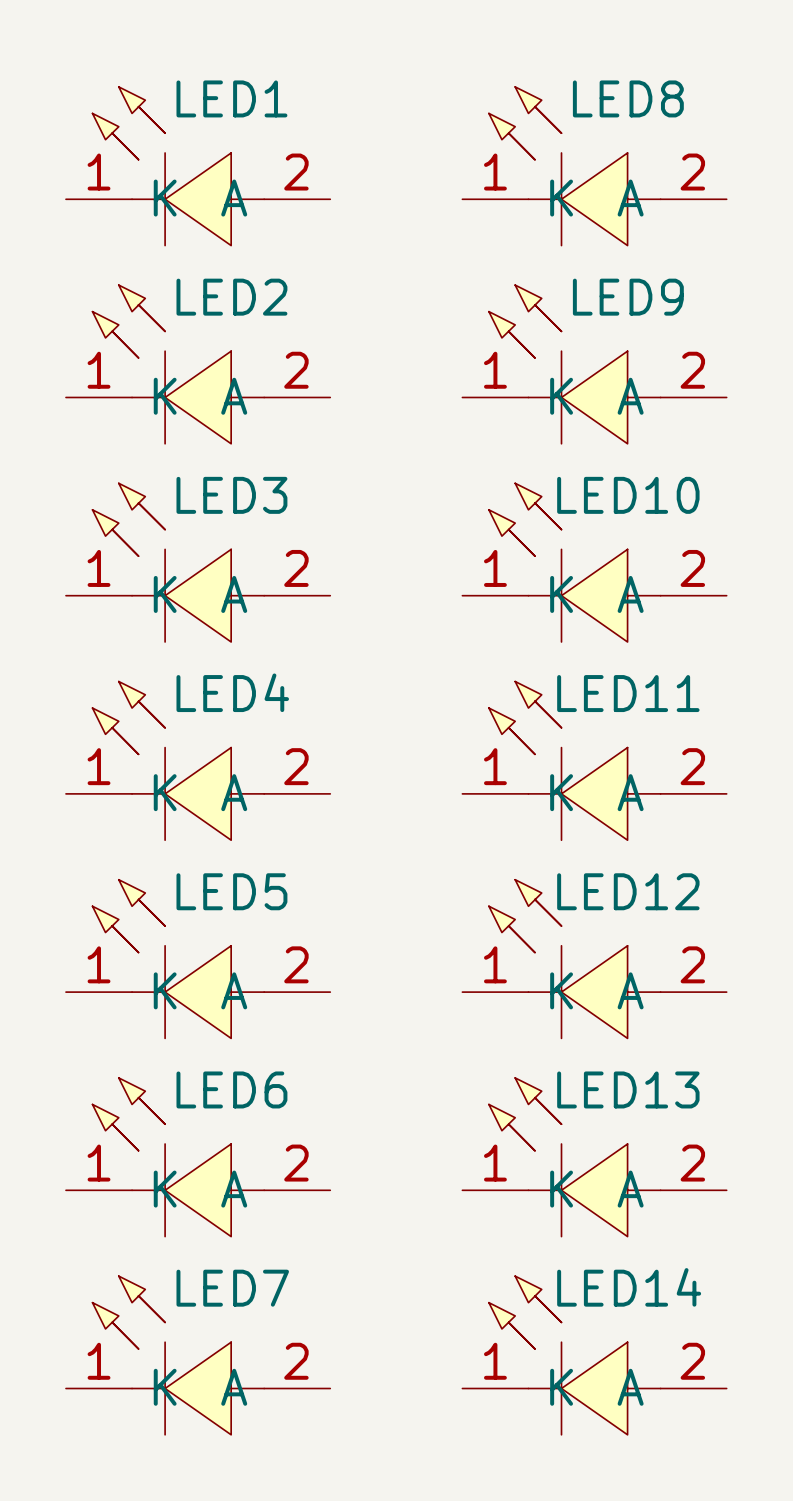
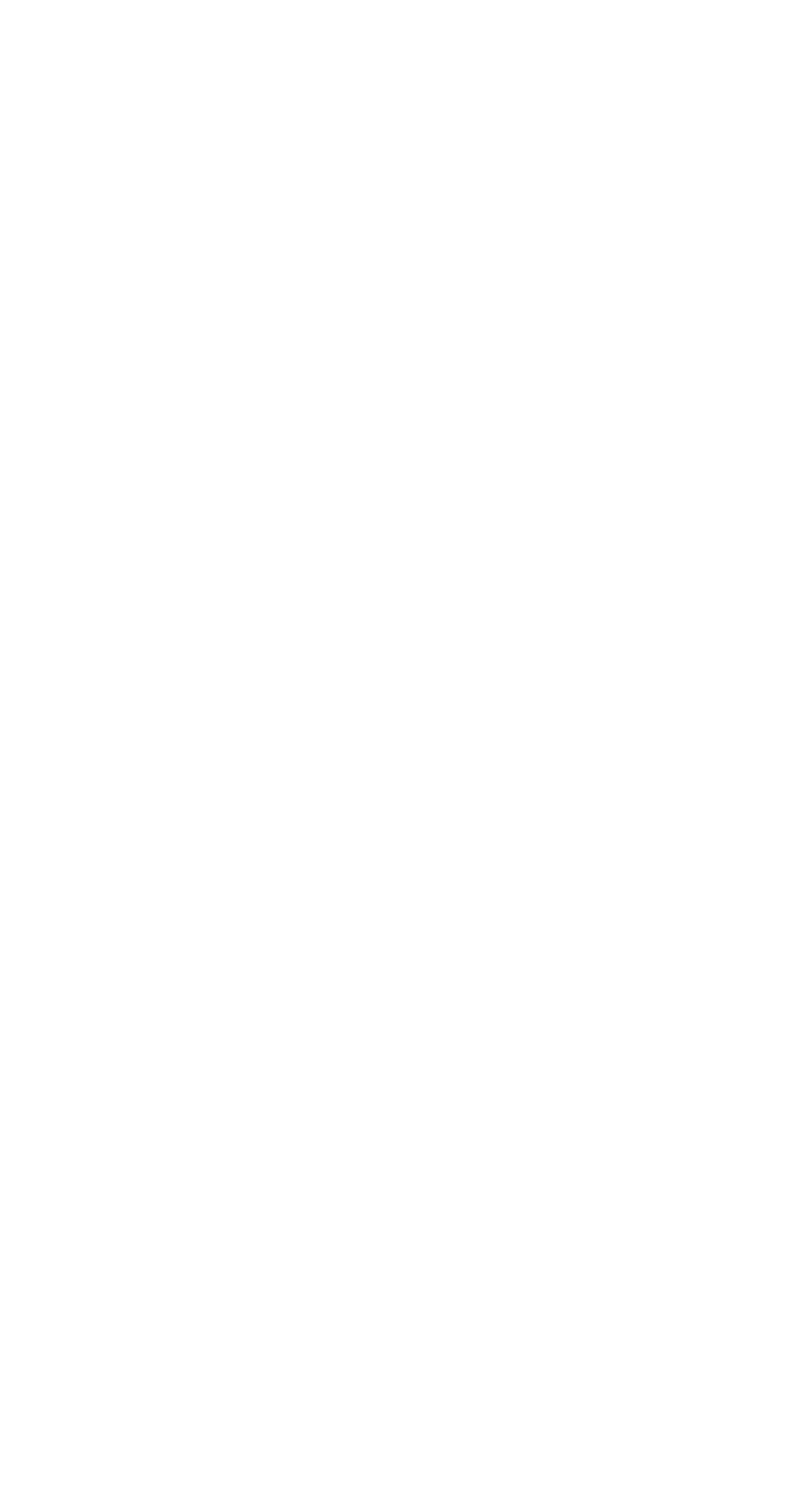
LED1: (198, 166) -> none
LED8: (594, 166) -> none
LED2: (198, 364) -> none
LED9: (594, 364) -> none
LED3: (198, 562) -> none
LED10: (594, 562) -> none
LED4: (198, 760) -> none
LED11: (594, 760) -> none
LED5: (198, 959) -> none
LED12: (594, 959) -> none
LED6: (198, 1157) -> none
LED13: (594, 1157) -> none
LED7: (198, 1355) -> none
LED14: (594, 1355) -> none

